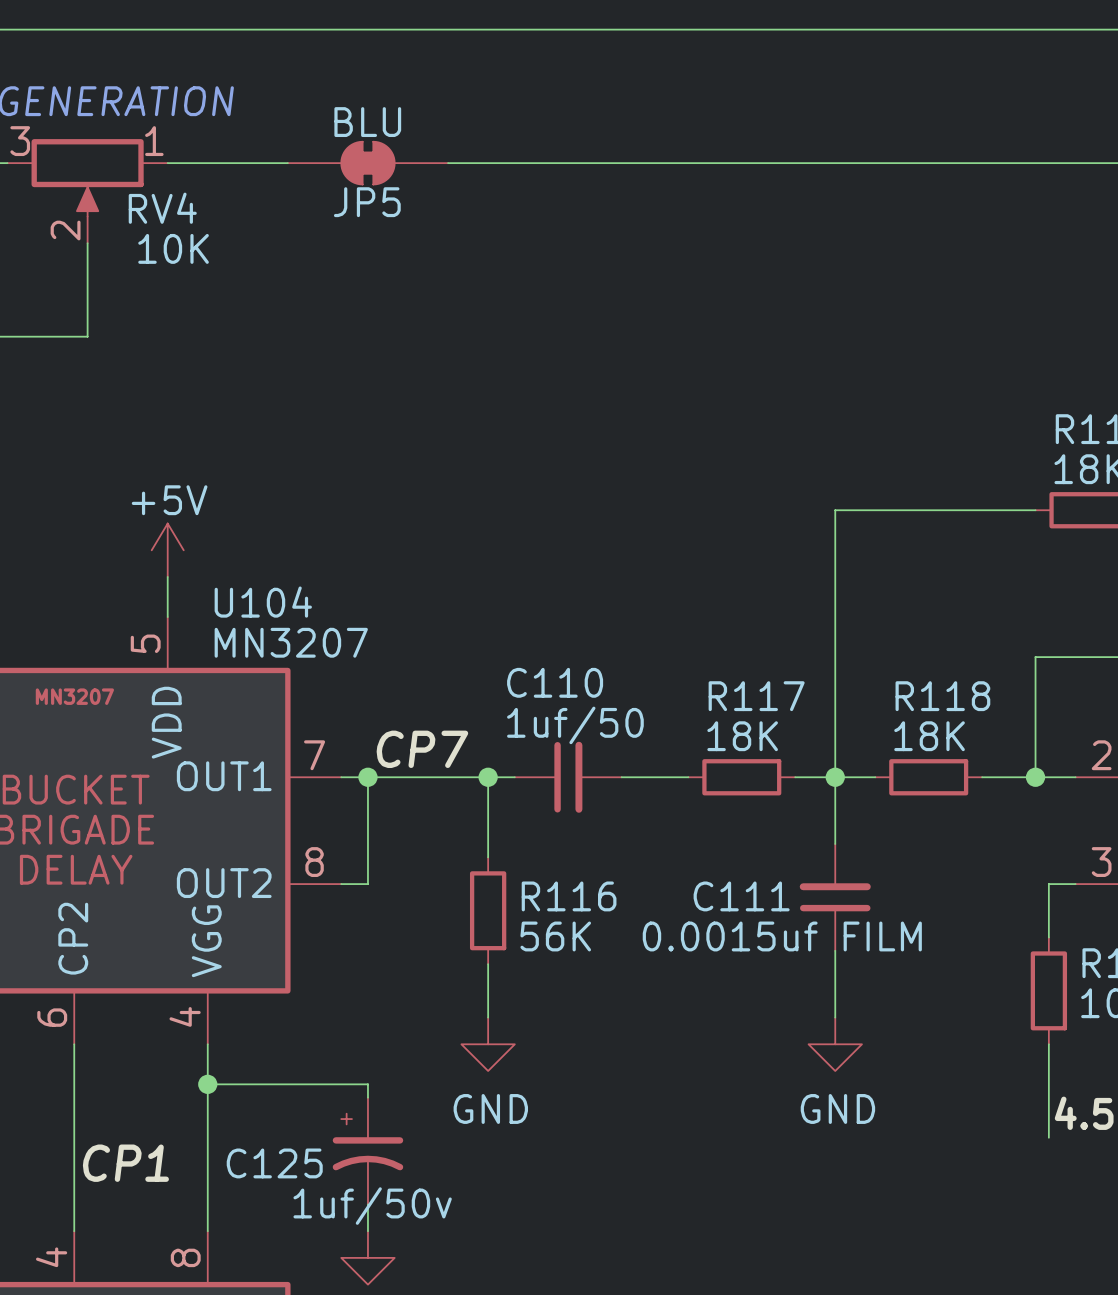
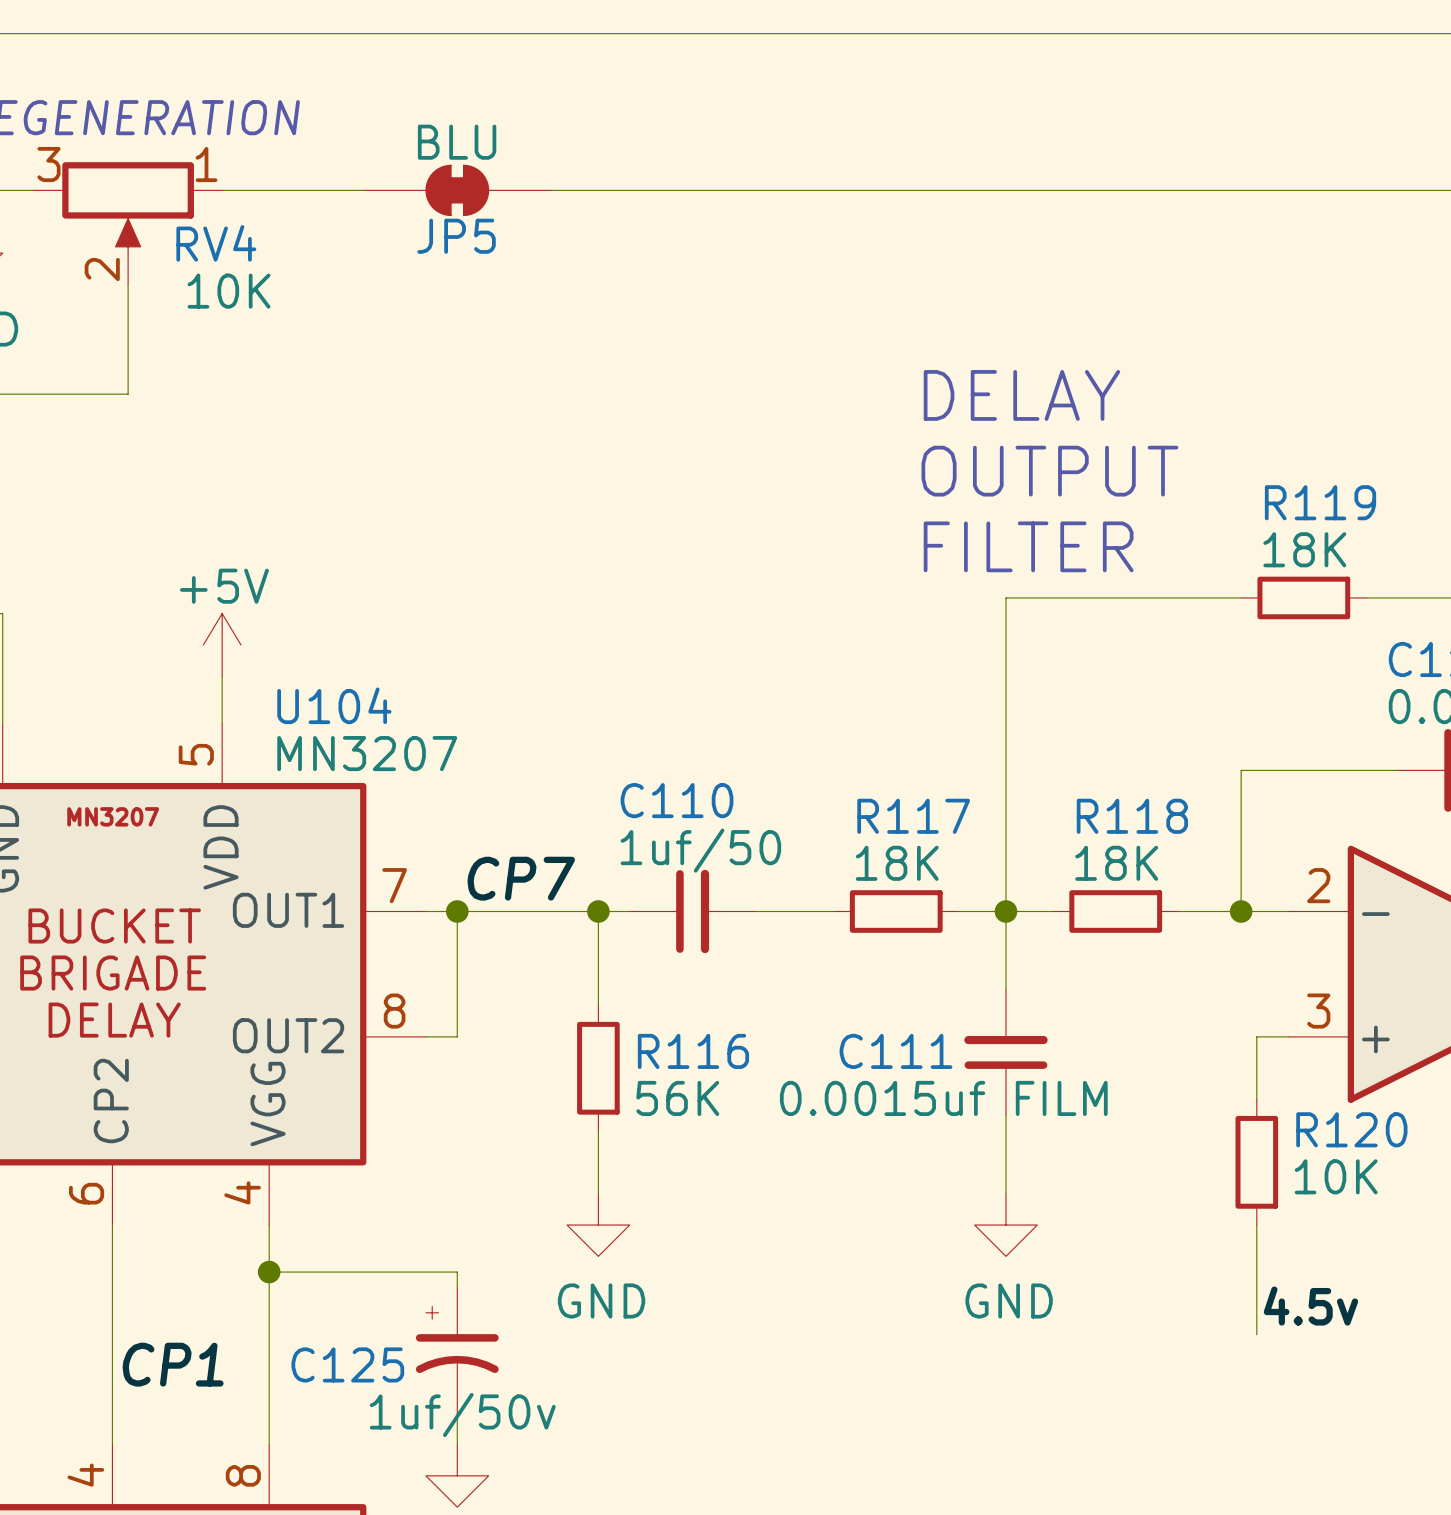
text: none -> DELAY (1021, 395)
text: none -> OUTPUT (1049, 471)
text: none -> FILTER (1028, 546)

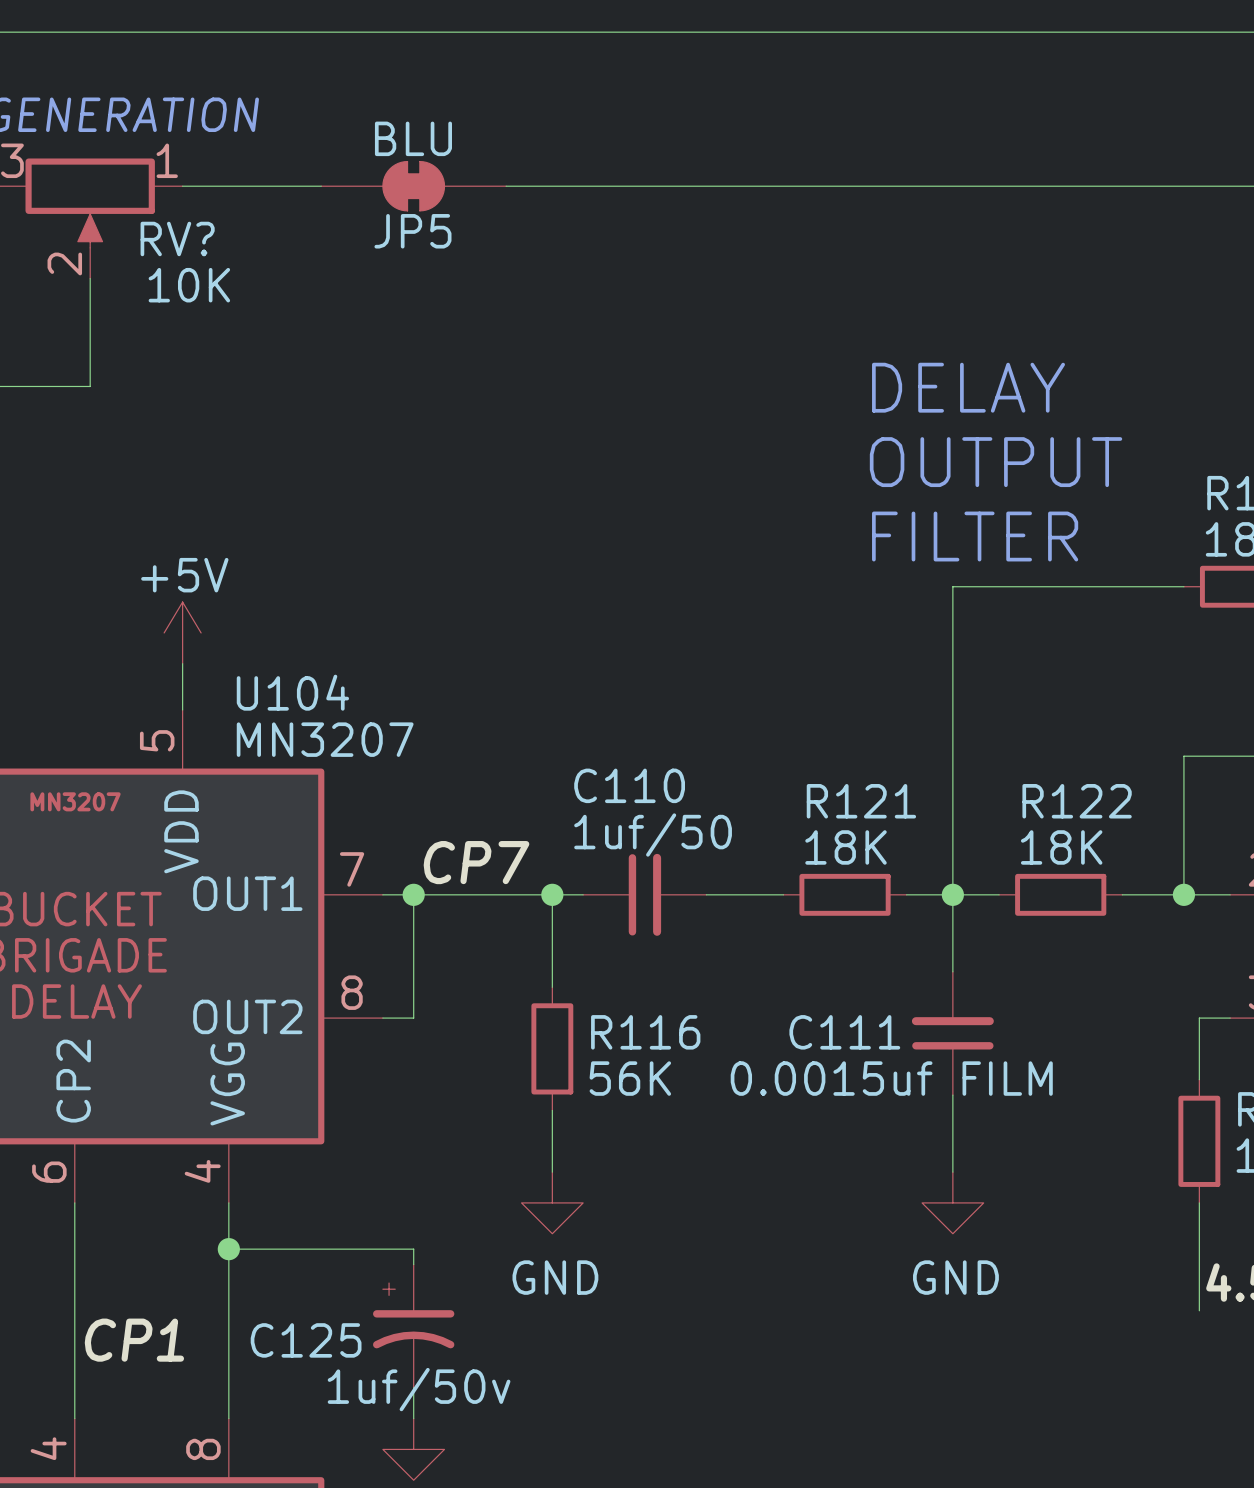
RV4 name: RV4 (216, 243) -> RV? (177, 238)
R117 name: R117 (913, 816) -> R121 (861, 801)
R118 name: R118 (1132, 816) -> R122 (1077, 801)

